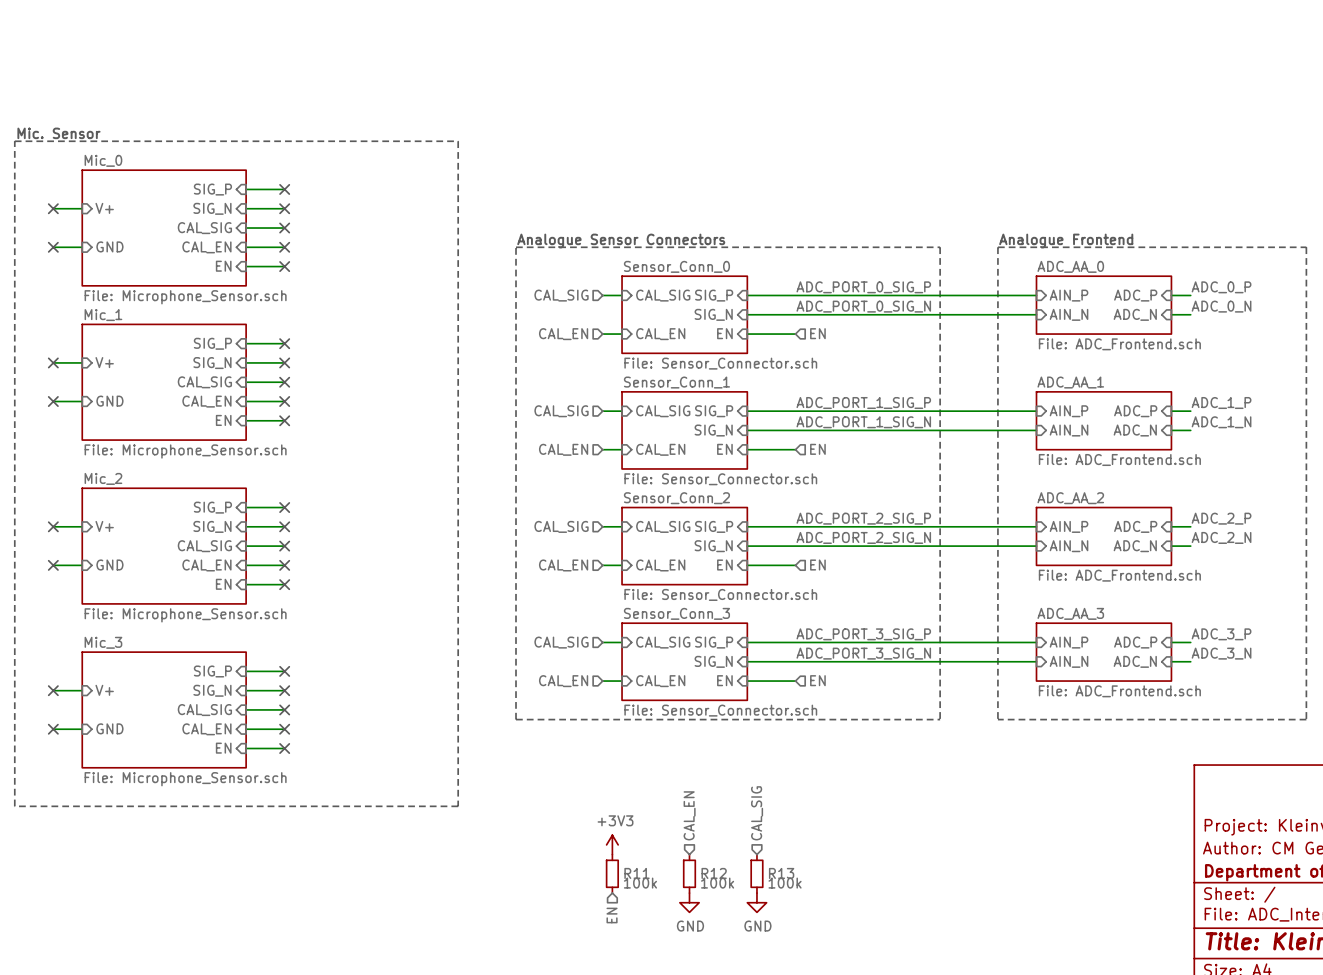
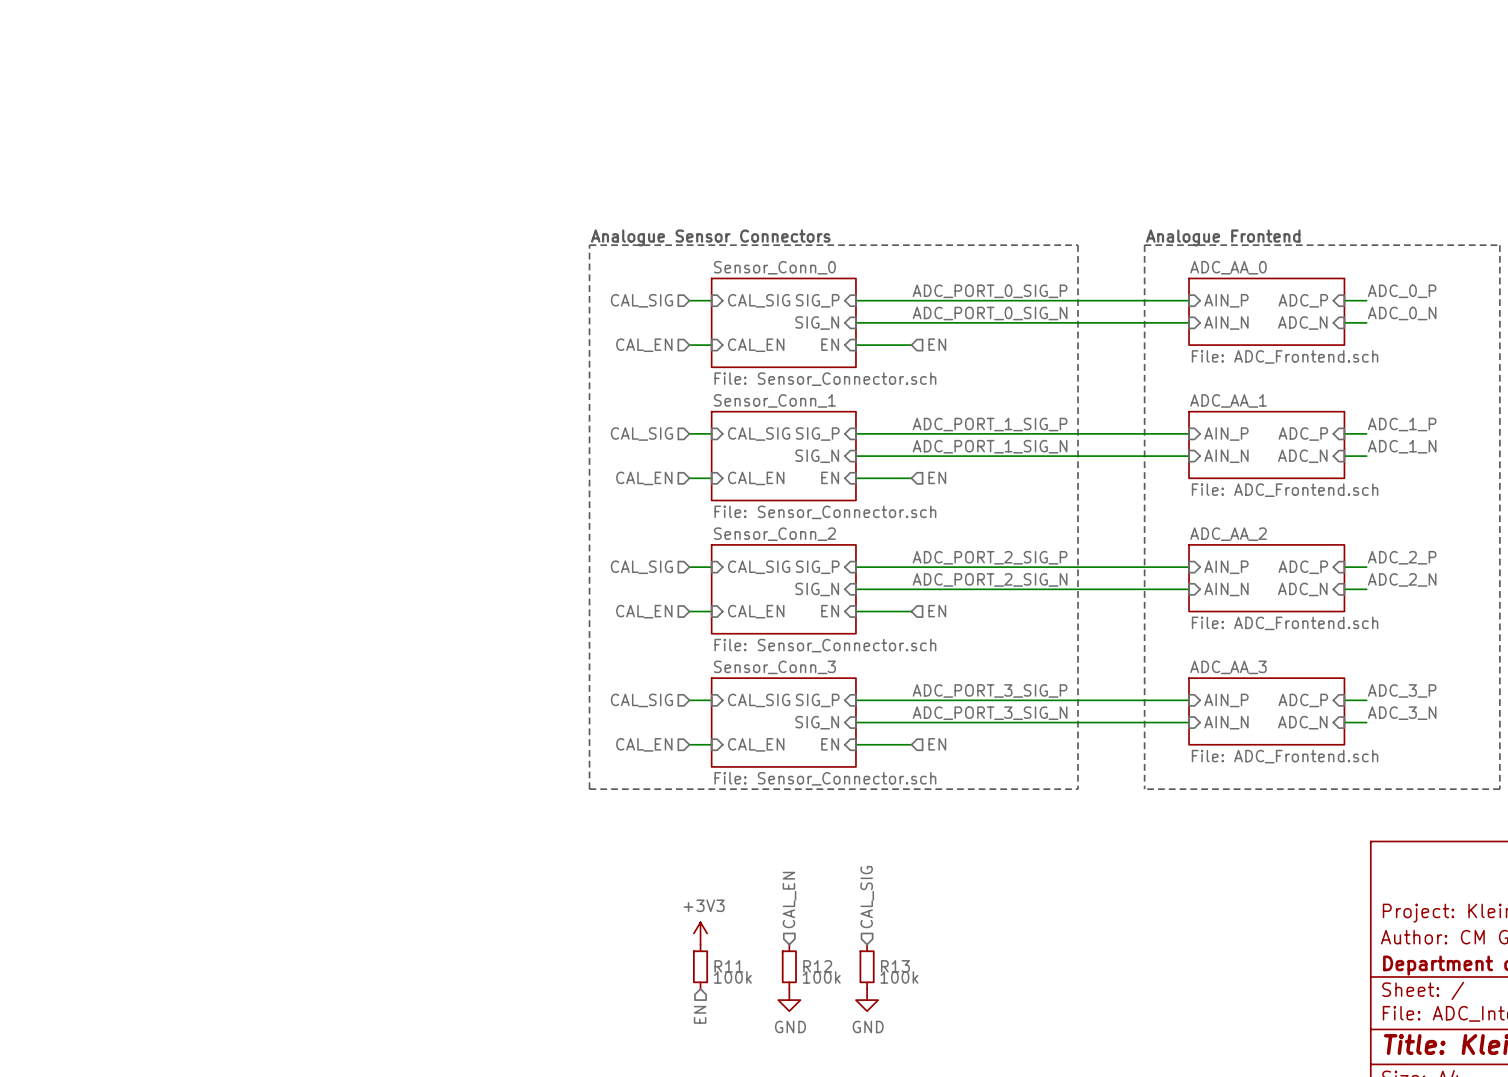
text: Mic. Sensor (58, 133) -> none
line: (14, 141) (14, 806) (458, 806) (458, 141) (14, 141) -> none
sheet pin: SIG_P (212, 189) -> none
wire: (246, 189) (284, 189) -> none
no-connect mark: (284, 189) -> none
wire: (53, 208) (82, 208) -> none
no-connect mark: (53, 208) -> none
sheet pin: V+ (104, 208) -> none
sheet pin: SIG_N (212, 208) -> none
wire: (246, 208) (284, 208) -> none
no-connect mark: (284, 208) -> none
sheet Mic_0: File: Microphone_Sensor.sch (164, 228) -> none
sheet pin: CAL_SIG (204, 228) -> none
wire: (246, 228) (284, 228) -> none
no-connect mark: (284, 228) -> none
sheet pin: GND (109, 246) -> none
wire: (53, 247) (82, 247) -> none
no-connect mark: (53, 247) -> none
sheet pin: CAL_EN (206, 247) -> none
wire: (246, 247) (284, 247) -> none
no-connect mark: (284, 247) -> none
sheet pin: EN (223, 266) -> none
wire: (246, 266) (284, 266) -> none
no-connect mark: (284, 266) -> none
sheet pin: SIG_P (212, 343) -> none
wire: (246, 343) (284, 343) -> none
no-connect mark: (284, 343) -> none
wire: (53, 362) (82, 362) -> none
no-connect mark: (53, 362) -> none
sheet pin: V+ (104, 362) -> none
wire: (246, 362) (284, 362) -> none
no-connect mark: (284, 362) -> none
sheet pin: SIG_N (212, 363) -> none
sheet Mic_1: File: Microphone_Sensor.sch (164, 382) -> none
sheet pin: CAL_SIG (204, 382) -> none
wire: (246, 382) (284, 382) -> none
no-connect mark: (284, 382) -> none
wire: (53, 401) (82, 401) -> none
no-connect mark: (53, 401) -> none
sheet pin: GND (109, 401) -> none
sheet pin: CAL_EN (206, 401) -> none
wire: (246, 401) (284, 401) -> none
no-connect mark: (284, 401) -> none
sheet pin: EN (223, 420) -> none
wire: (246, 420) (284, 420) -> none
no-connect mark: (284, 420) -> none
sheet pin: SIG_P (212, 507) -> none
wire: (246, 507) (284, 507) -> none
no-connect mark: (284, 507) -> none
wire: (53, 526) (82, 526) -> none
no-connect mark: (53, 526) -> none
sheet pin: V+ (104, 526) -> none
sheet pin: SIG_N (212, 526) -> none
wire: (246, 526) (284, 526) -> none
no-connect mark: (284, 526) -> none
sheet Mic_2: File: Microphone_Sensor.sch (164, 546) -> none
sheet pin: CAL_SIG (204, 546) -> none
wire: (246, 546) (284, 546) -> none
no-connect mark: (284, 546) -> none
wire: (53, 565) (82, 565) -> none
no-connect mark: (53, 565) -> none
sheet pin: GND (109, 565) -> none
sheet pin: CAL_EN (206, 565) -> none
wire: (246, 565) (284, 565) -> none
no-connect mark: (284, 565) -> none
sheet pin: EN (223, 584) -> none
wire: (246, 584) (284, 584) -> none
no-connect mark: (284, 584) -> none
sheet pin: SIG_P (212, 671) -> none
wire: (246, 671) (284, 671) -> none
no-connect mark: (284, 671) -> none
wire: (53, 690) (82, 690) -> none
no-connect mark: (53, 690) -> none
sheet pin: V+ (104, 690) -> none
sheet pin: SIG_N (212, 690) -> none
wire: (246, 690) (284, 690) -> none
no-connect mark: (284, 690) -> none
sheet Mic_3: File: Microphone_Sensor.sch (164, 709) -> none
wire: (246, 709) (284, 709) -> none
no-connect mark: (284, 709) -> none
sheet pin: CAL_SIG (204, 710) -> none
sheet pin: GND (109, 728) -> none
wire: (53, 729) (82, 729) -> none
no-connect mark: (53, 729) -> none
sheet pin: CAL_EN (206, 729) -> none
wire: (246, 729) (284, 729) -> none
no-connect mark: (284, 729) -> none
sheet pin: EN (223, 748) -> none
wire: (246, 748) (284, 748) -> none
no-connect mark: (284, 748) -> none

